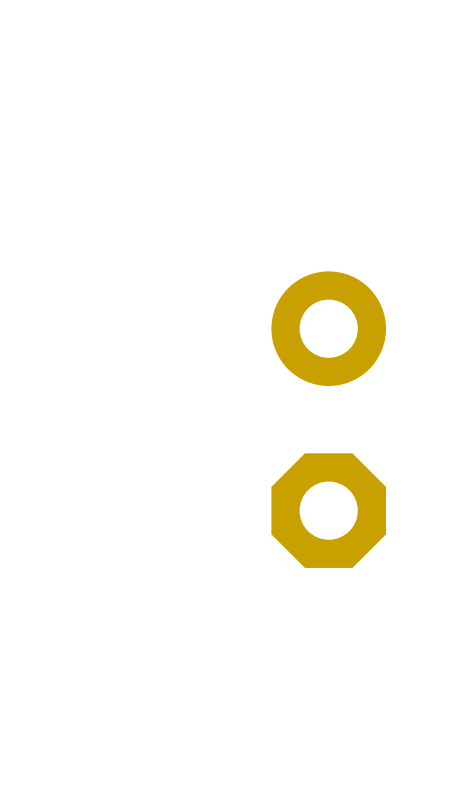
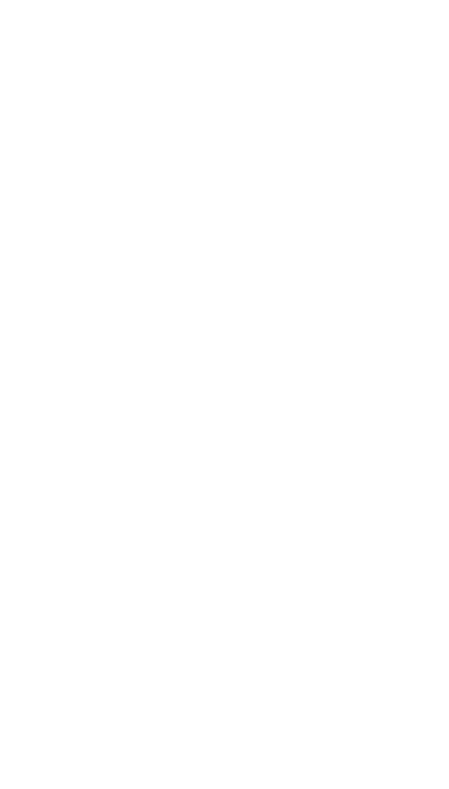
part: (328, 419) -> none

